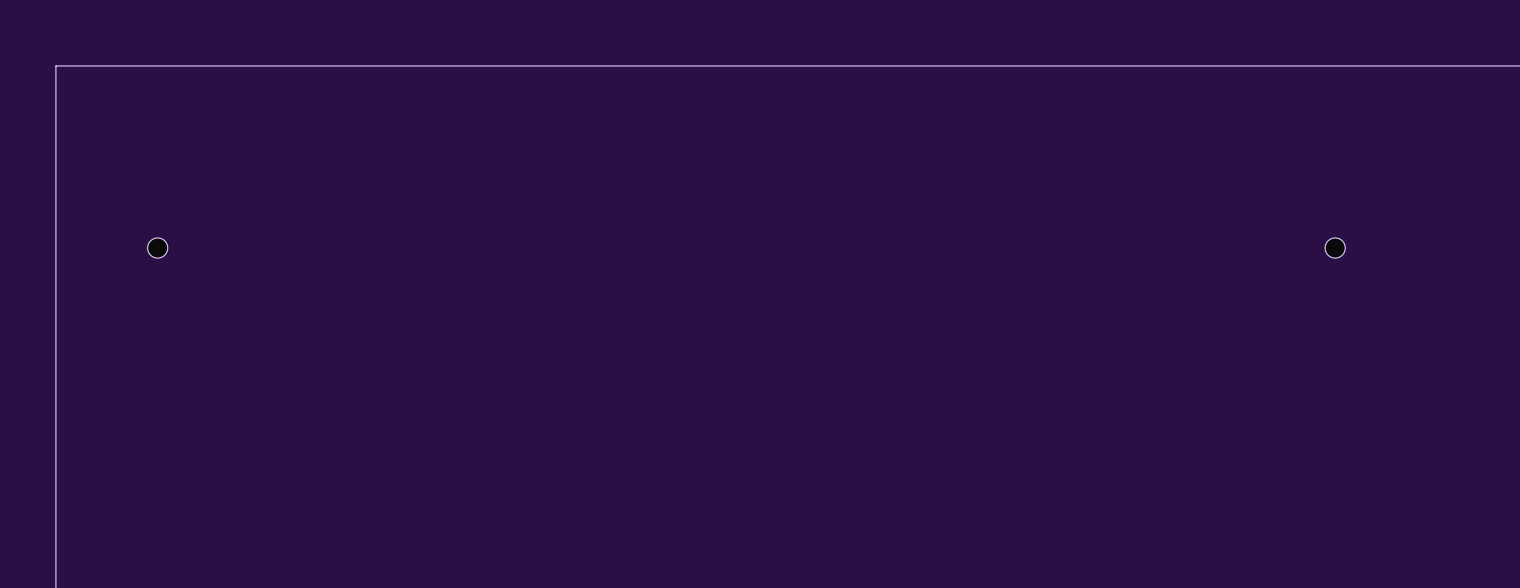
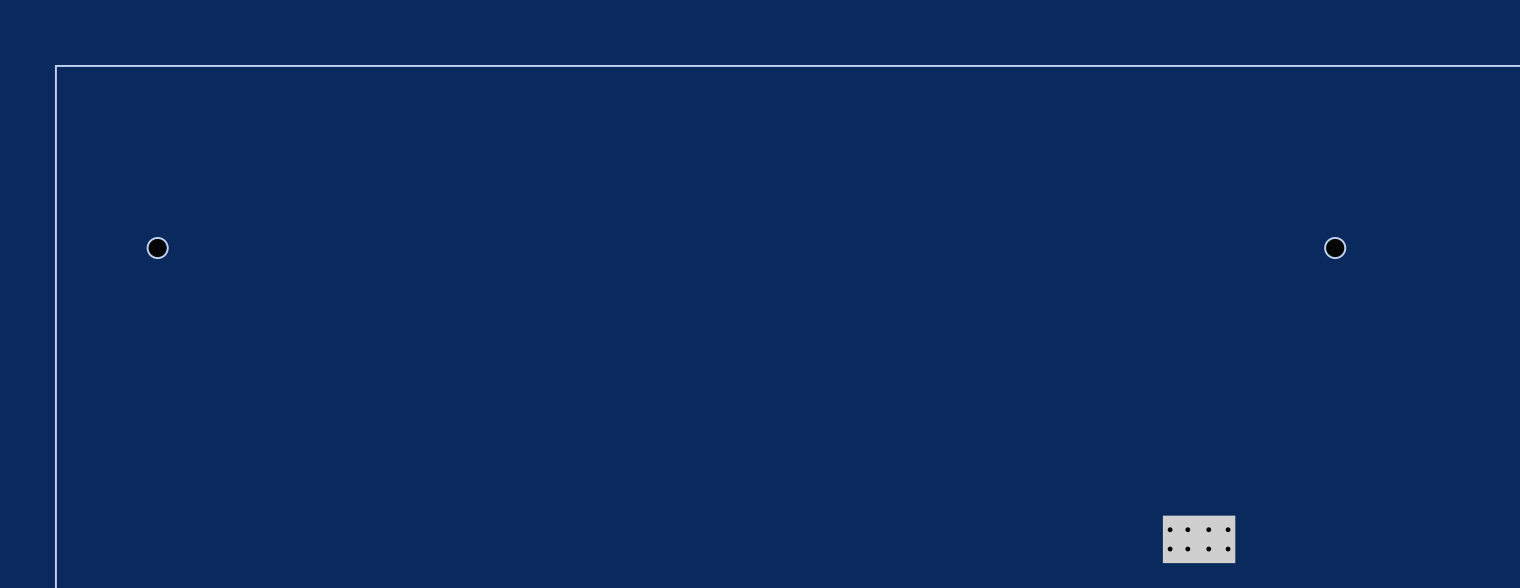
part: none -> (1199, 539)

